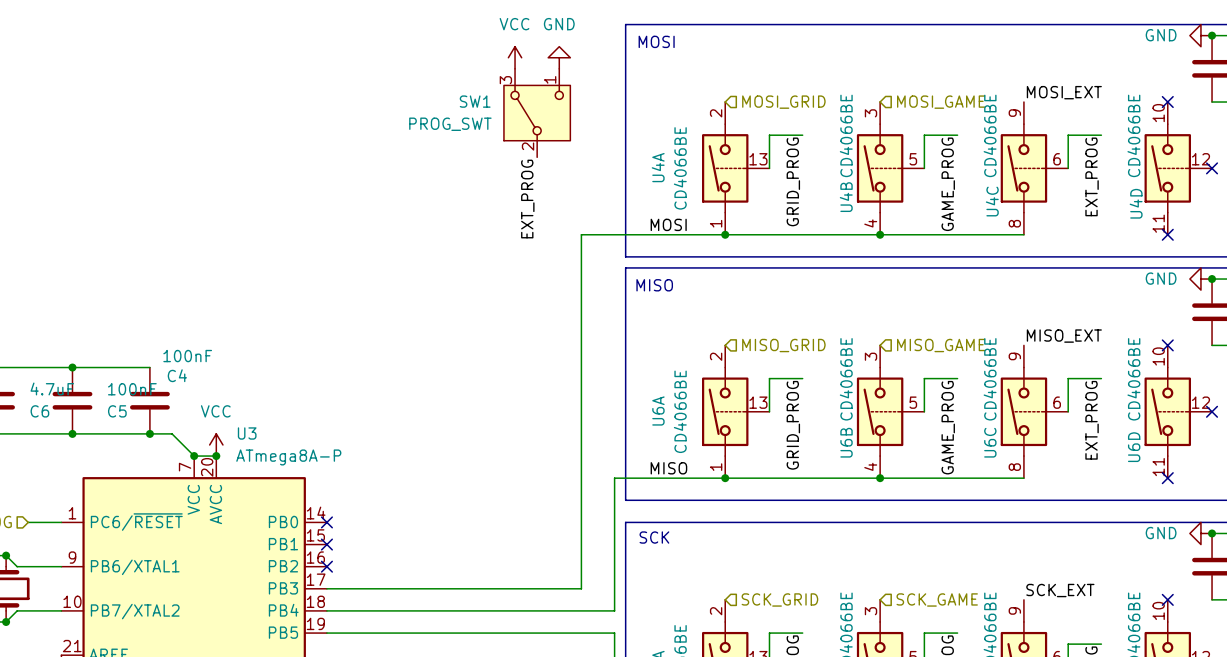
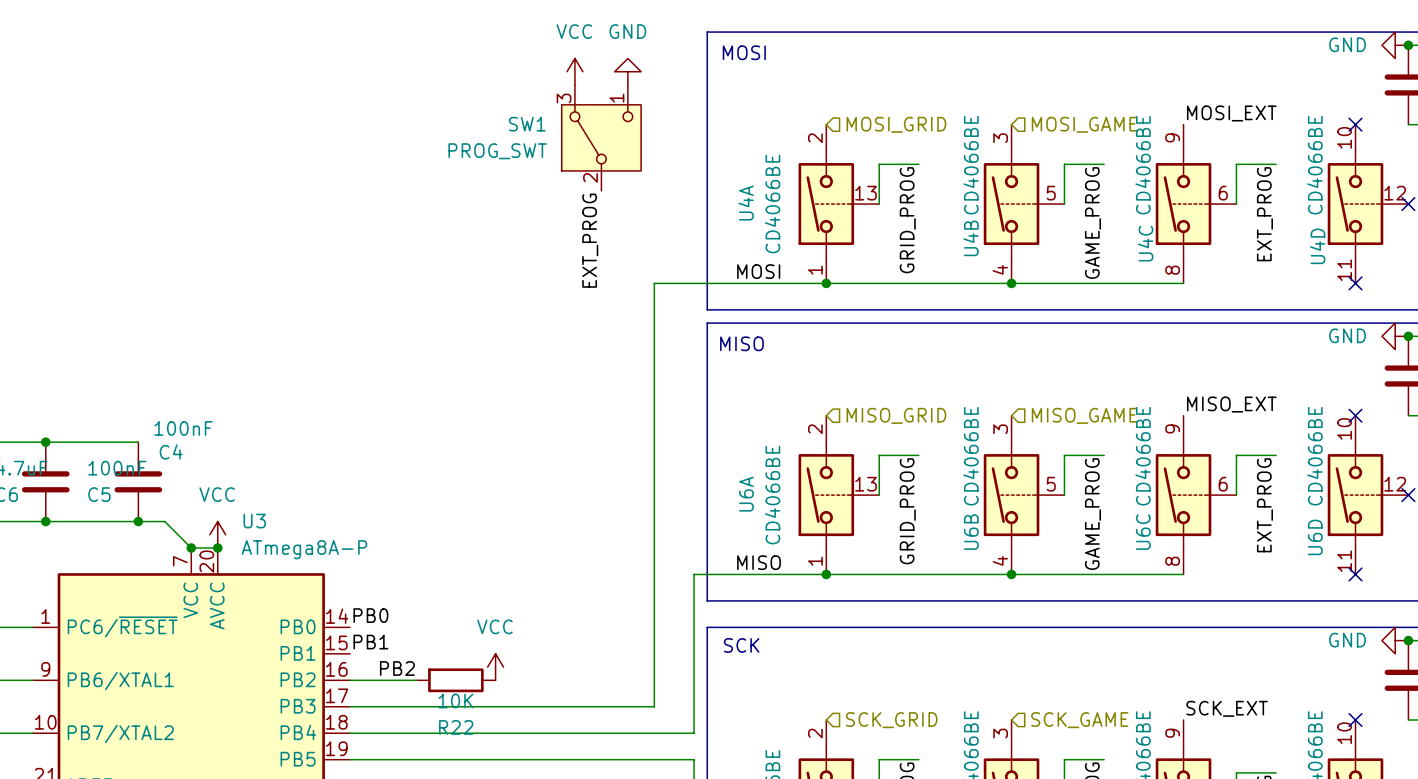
label: none -> PB0 (370, 615)
no-connect mark: (326, 522) -> none
label: none -> PB1 (370, 642)
no-connect mark: (326, 544) -> none
power symbol: none -> VCC (495, 667)
label: none -> PB2 (397, 668)
wire: none -> (350, 680) (416, 680)
no-connect mark: (326, 566) -> none
R22: none -> 10K (455, 680)

